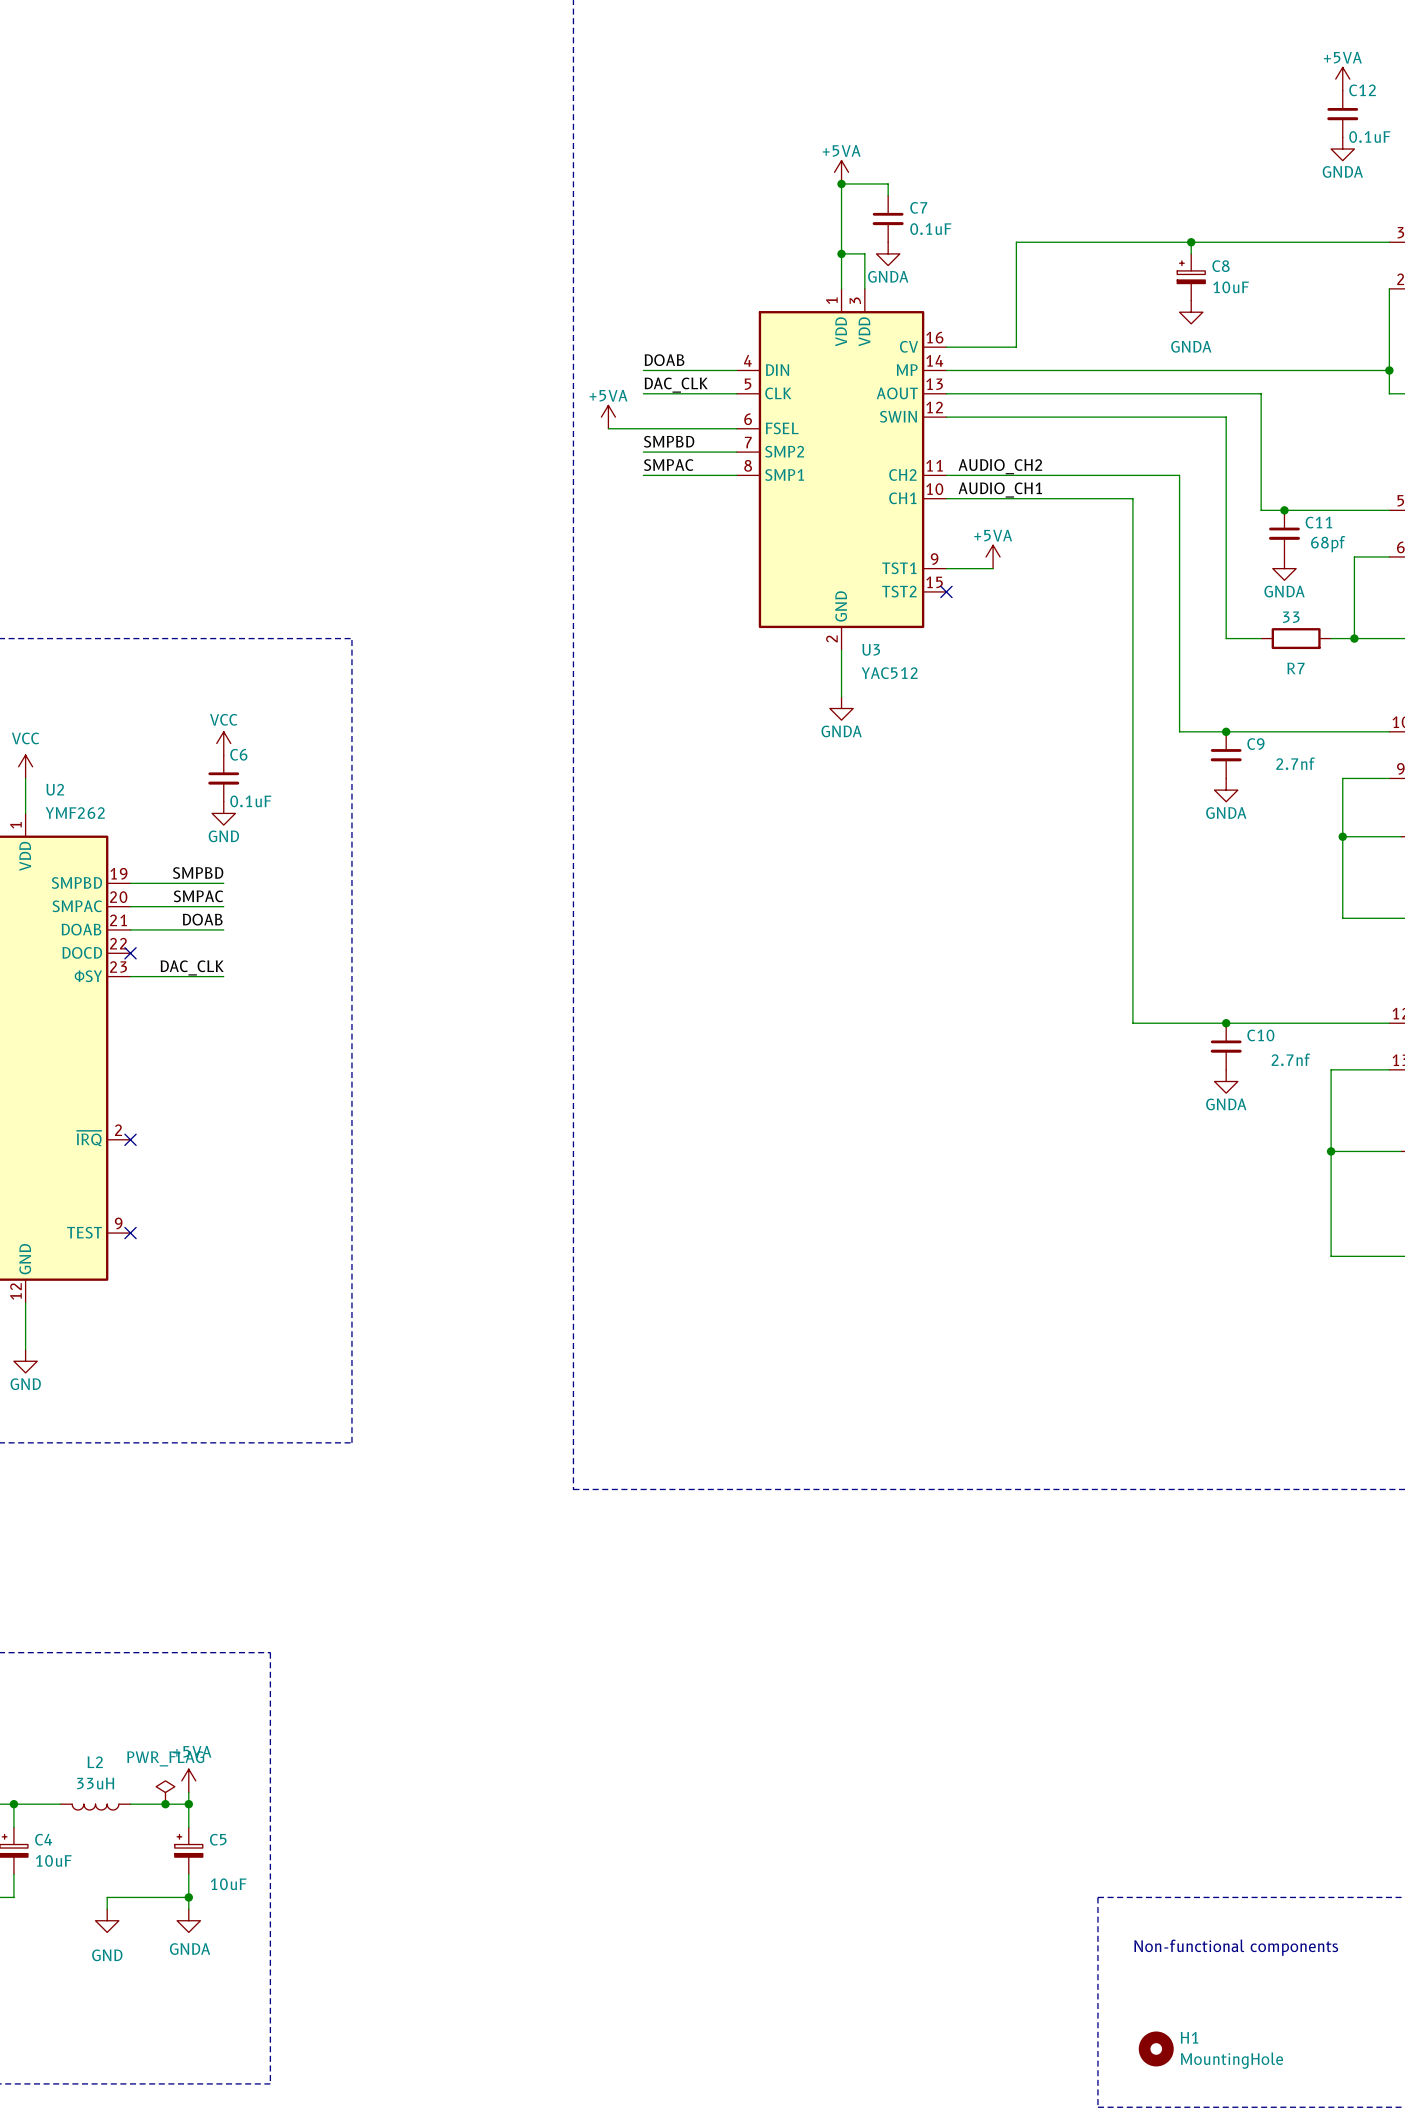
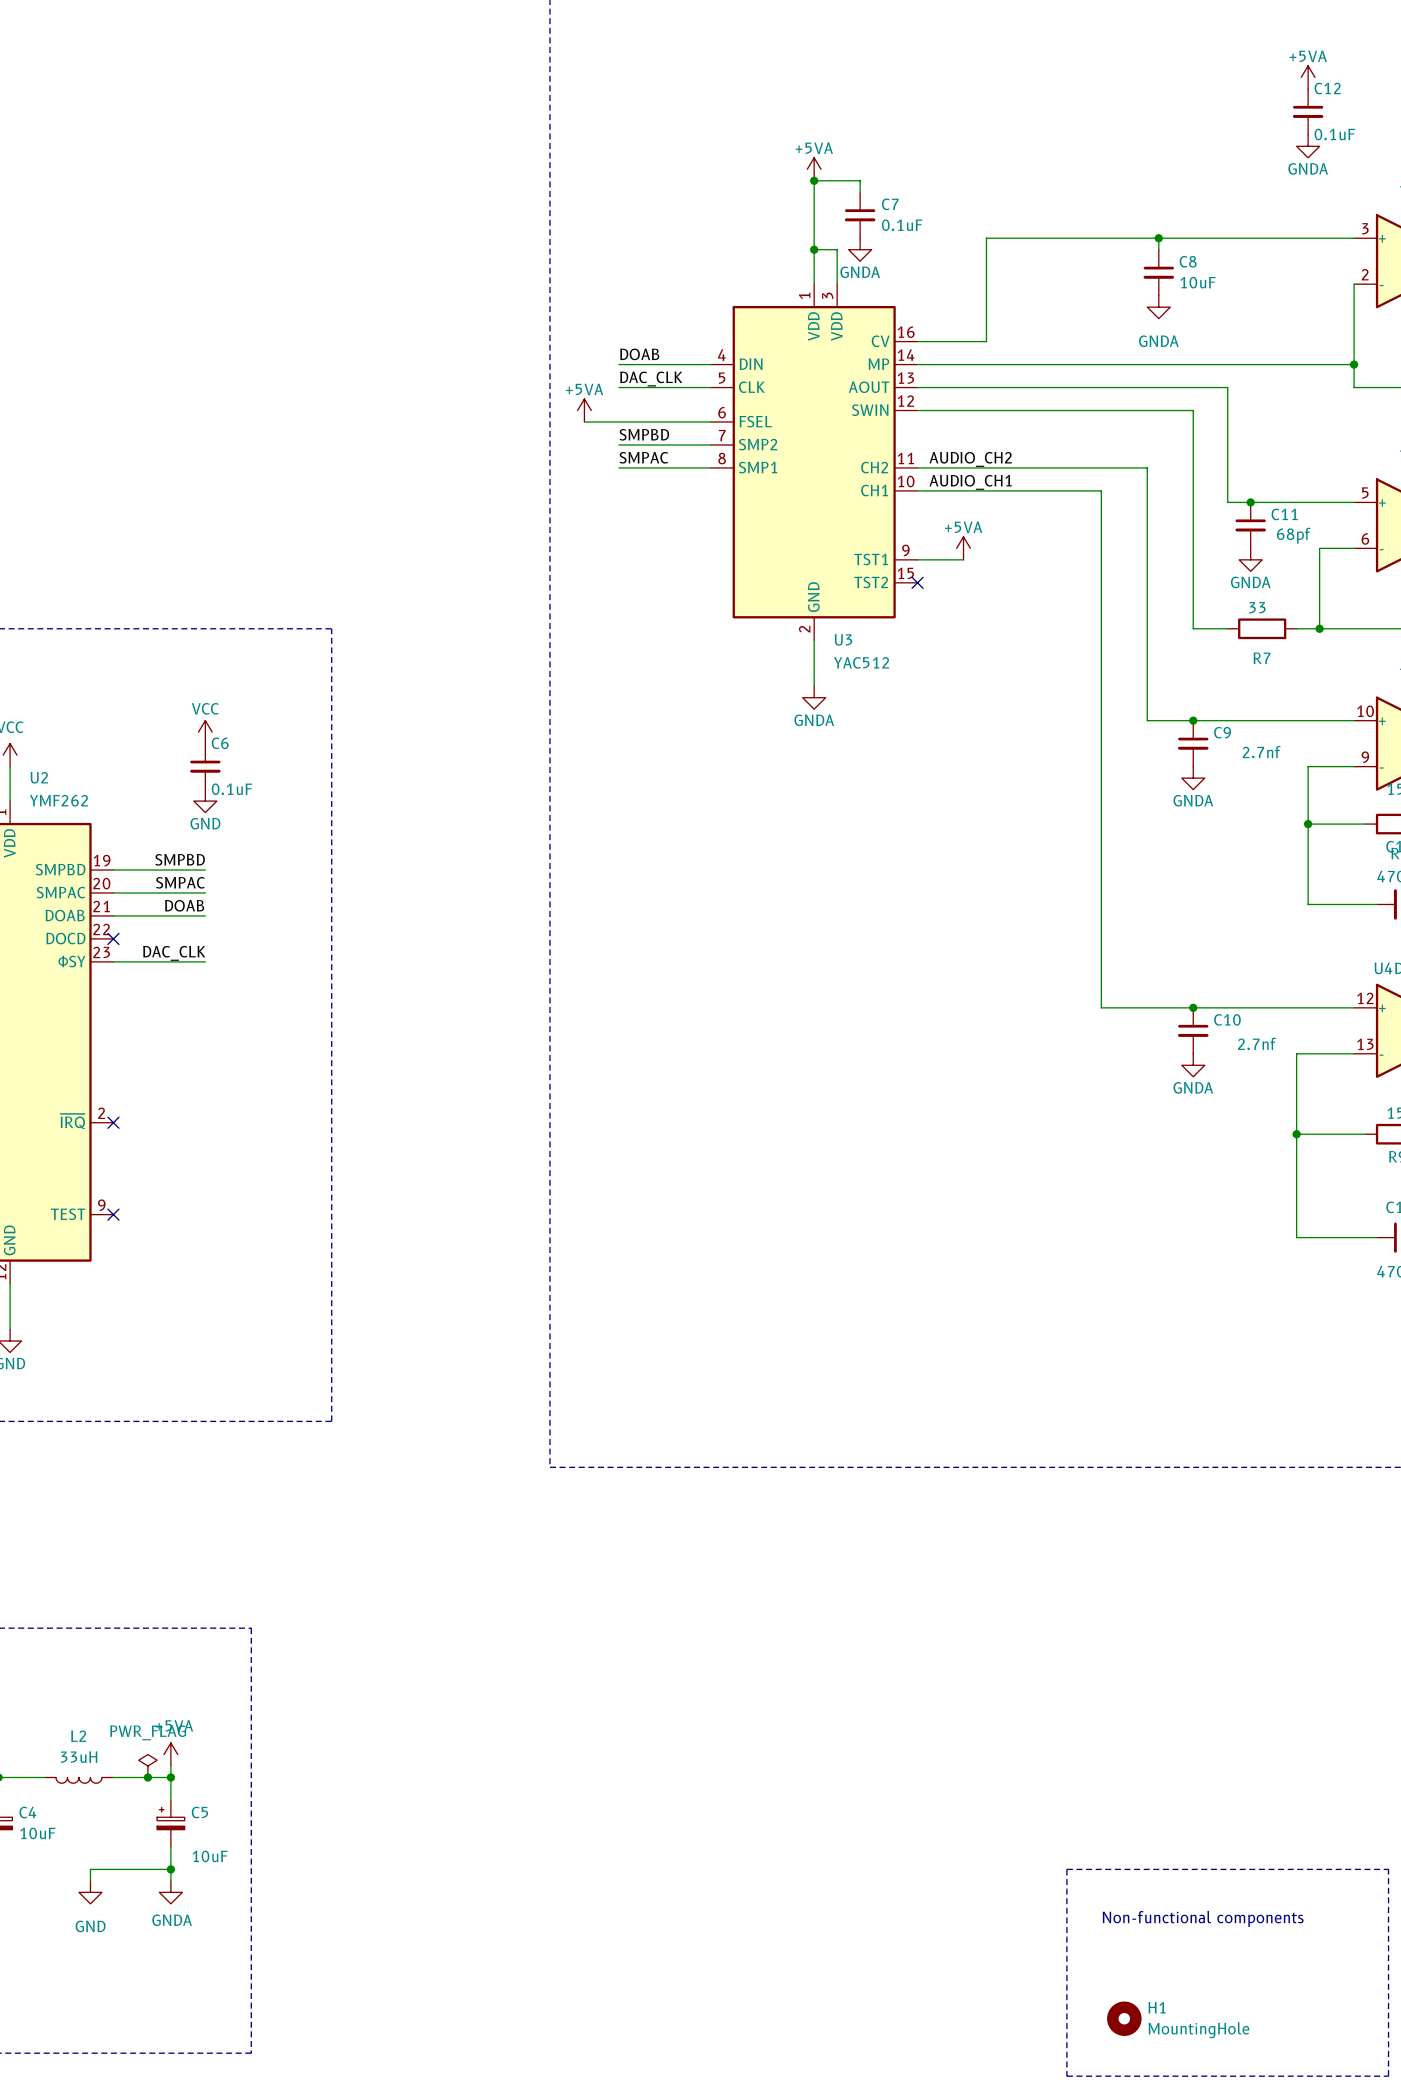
C8 symbol: [1177, 253, 1206, 301] -> [1143, 249, 1175, 296]

